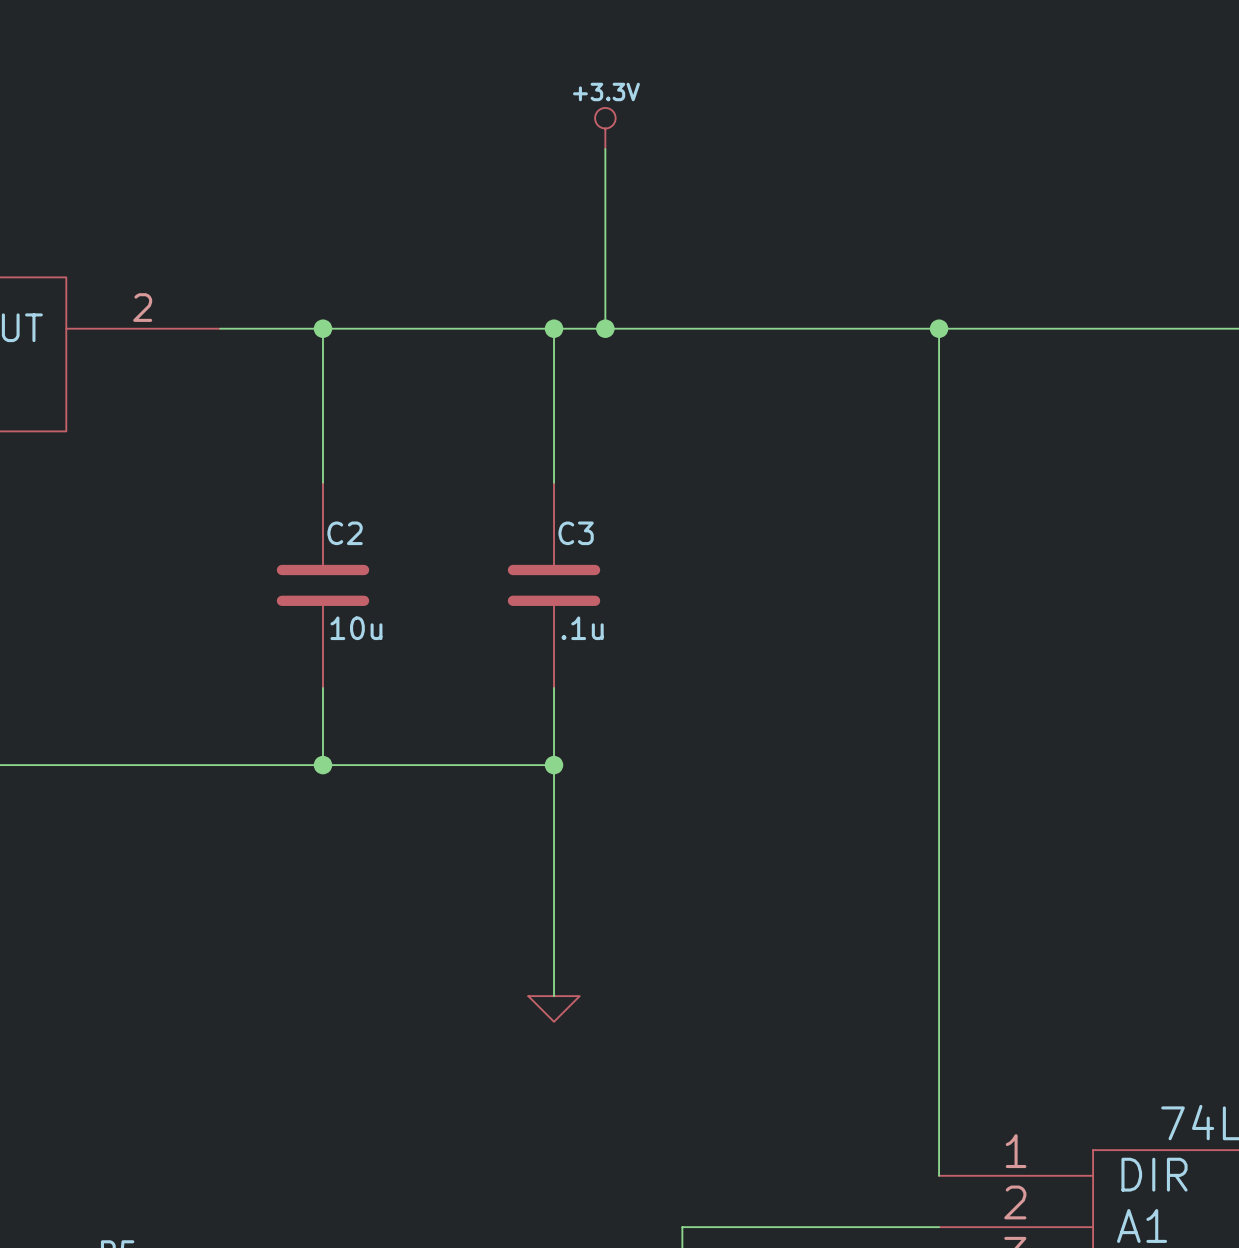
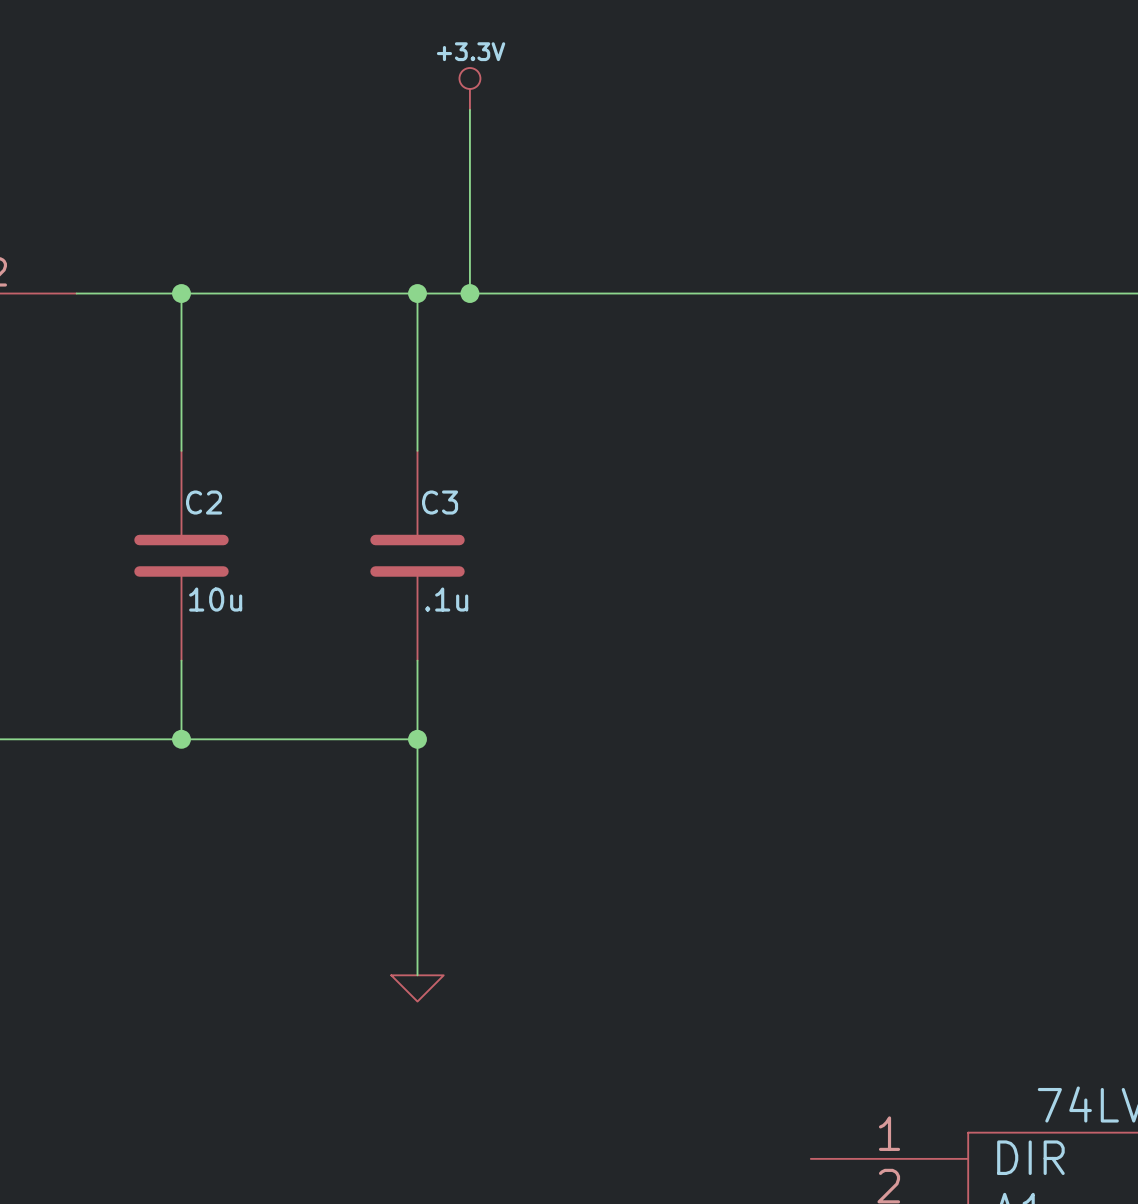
wire: (939, 328) (939, 1175) -> none
junction: (939, 328) -> none

